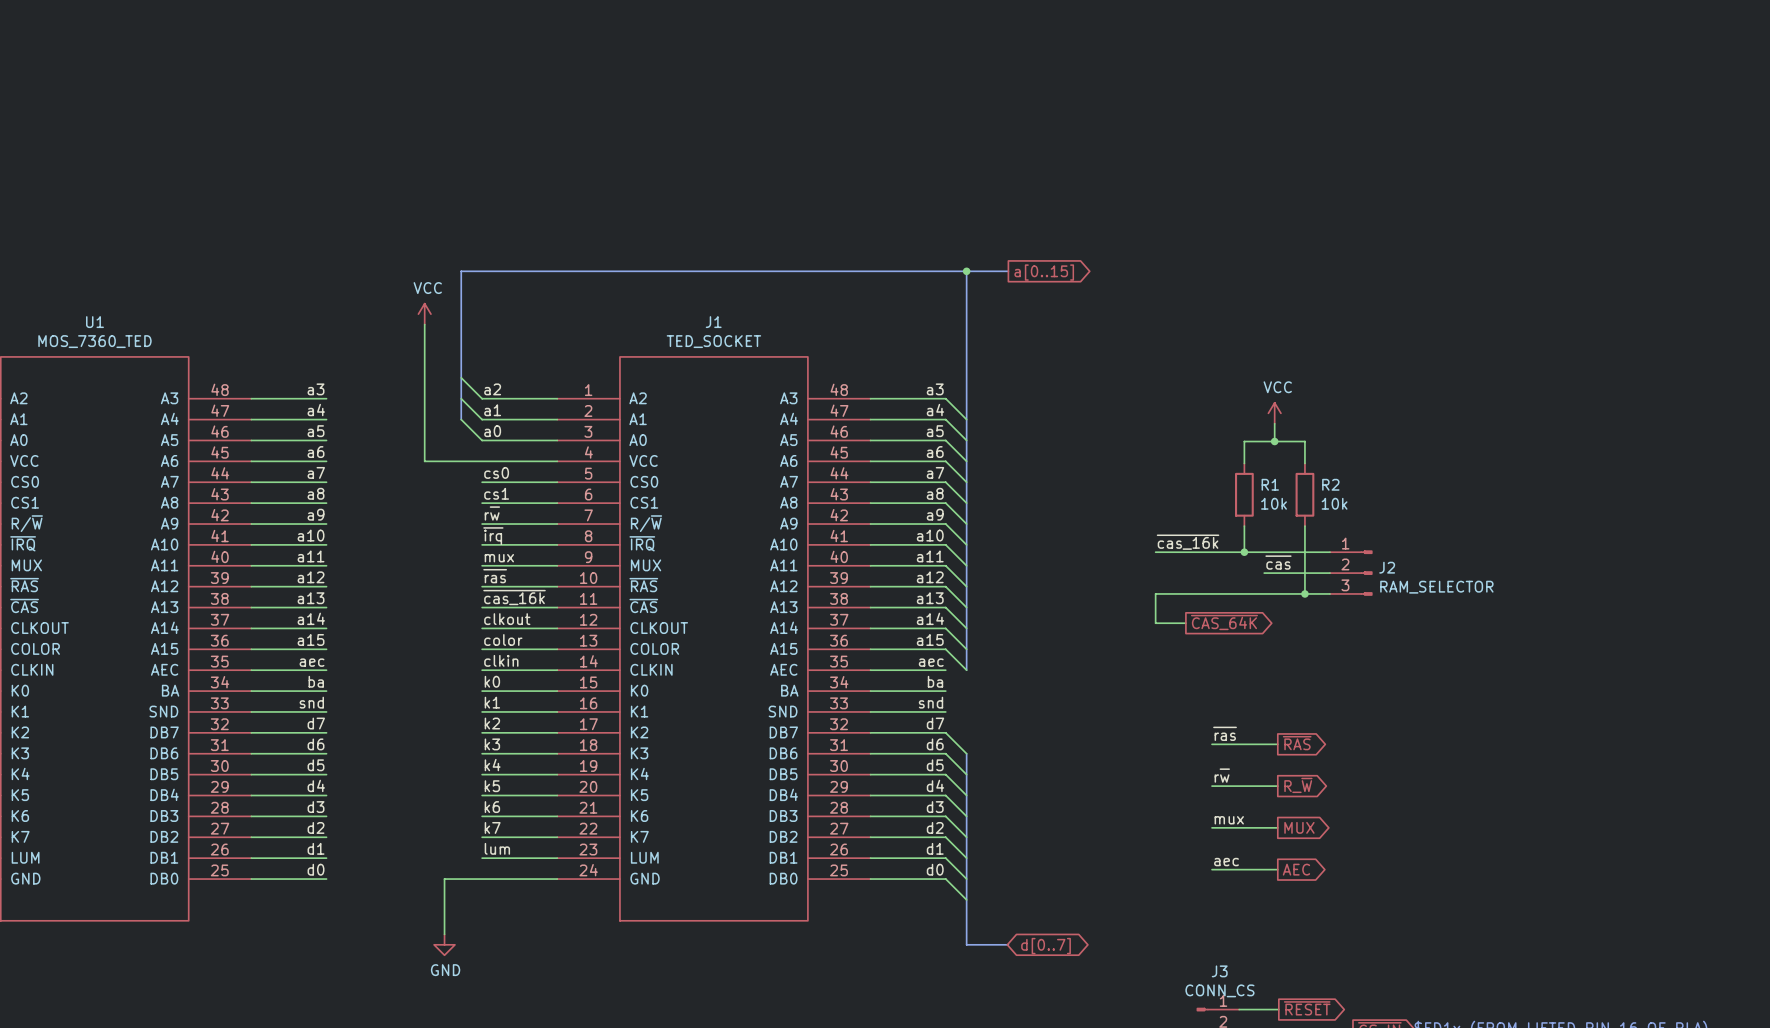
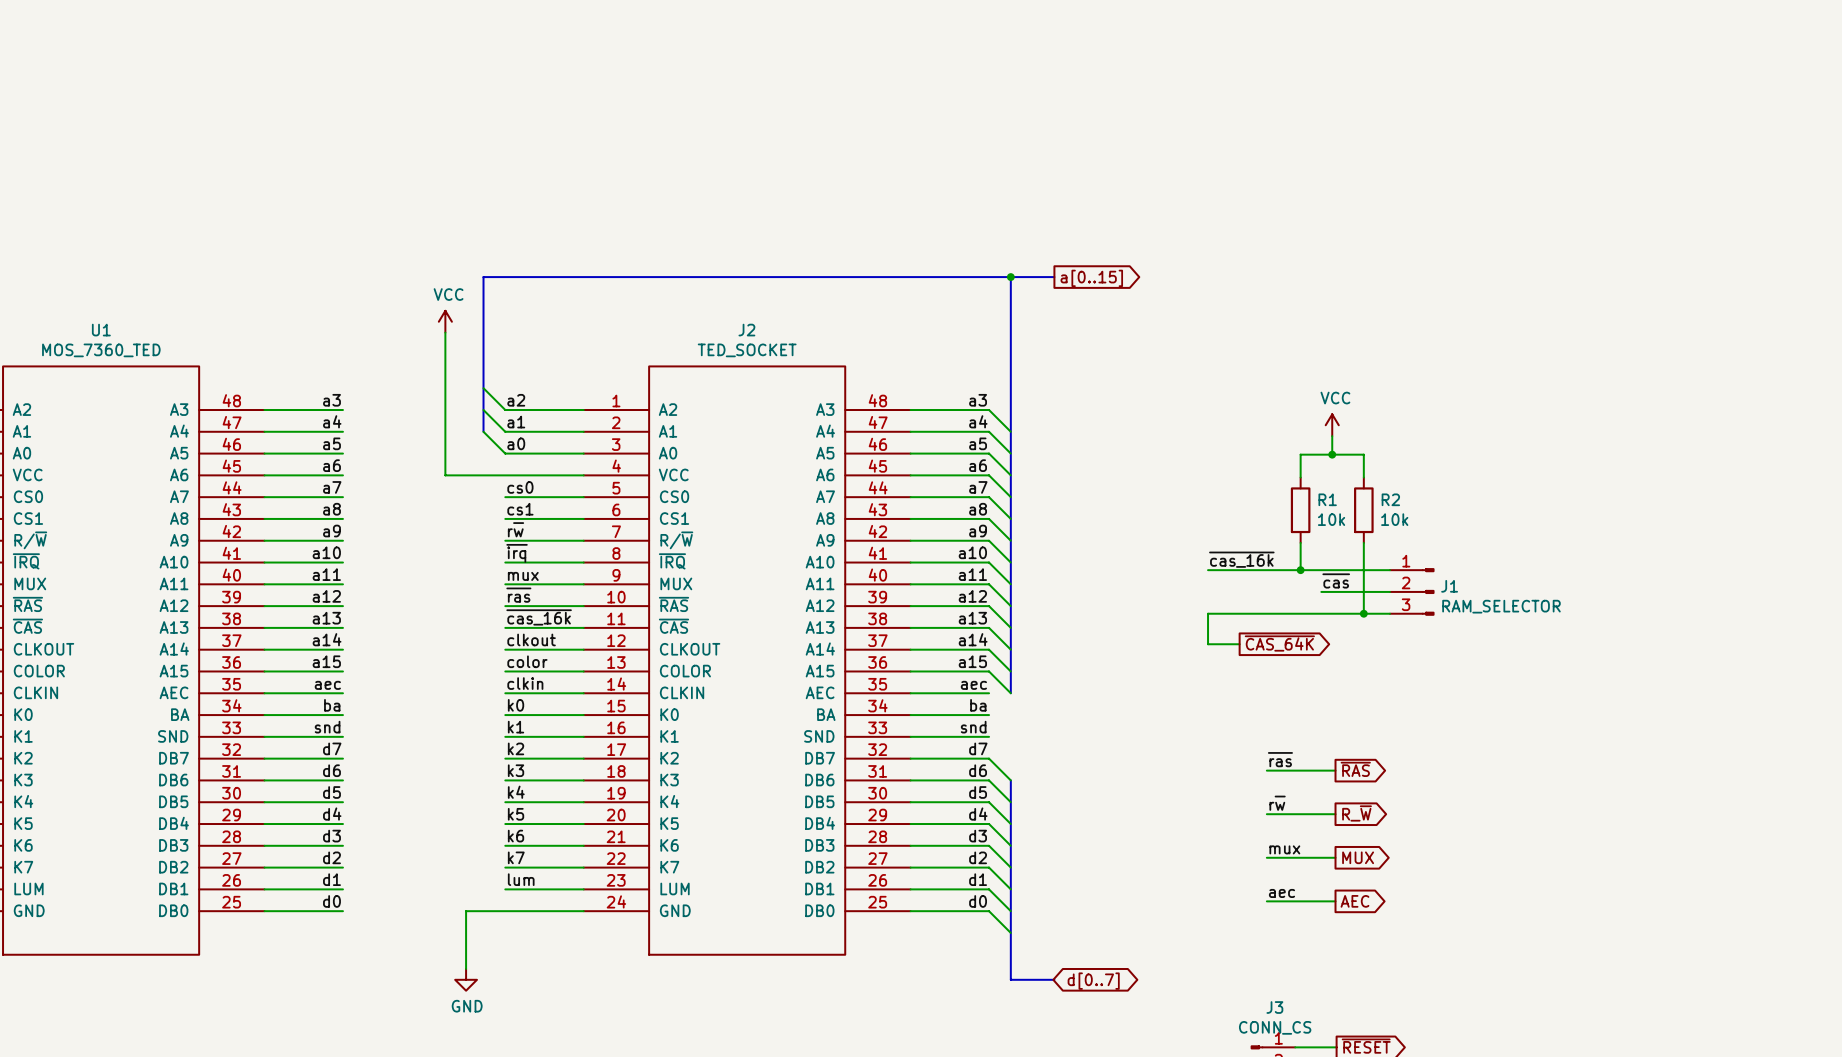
J1 name: J1 (713, 322) -> J2 (746, 330)
J2 name: J2 (1387, 567) -> J1 (1449, 586)

